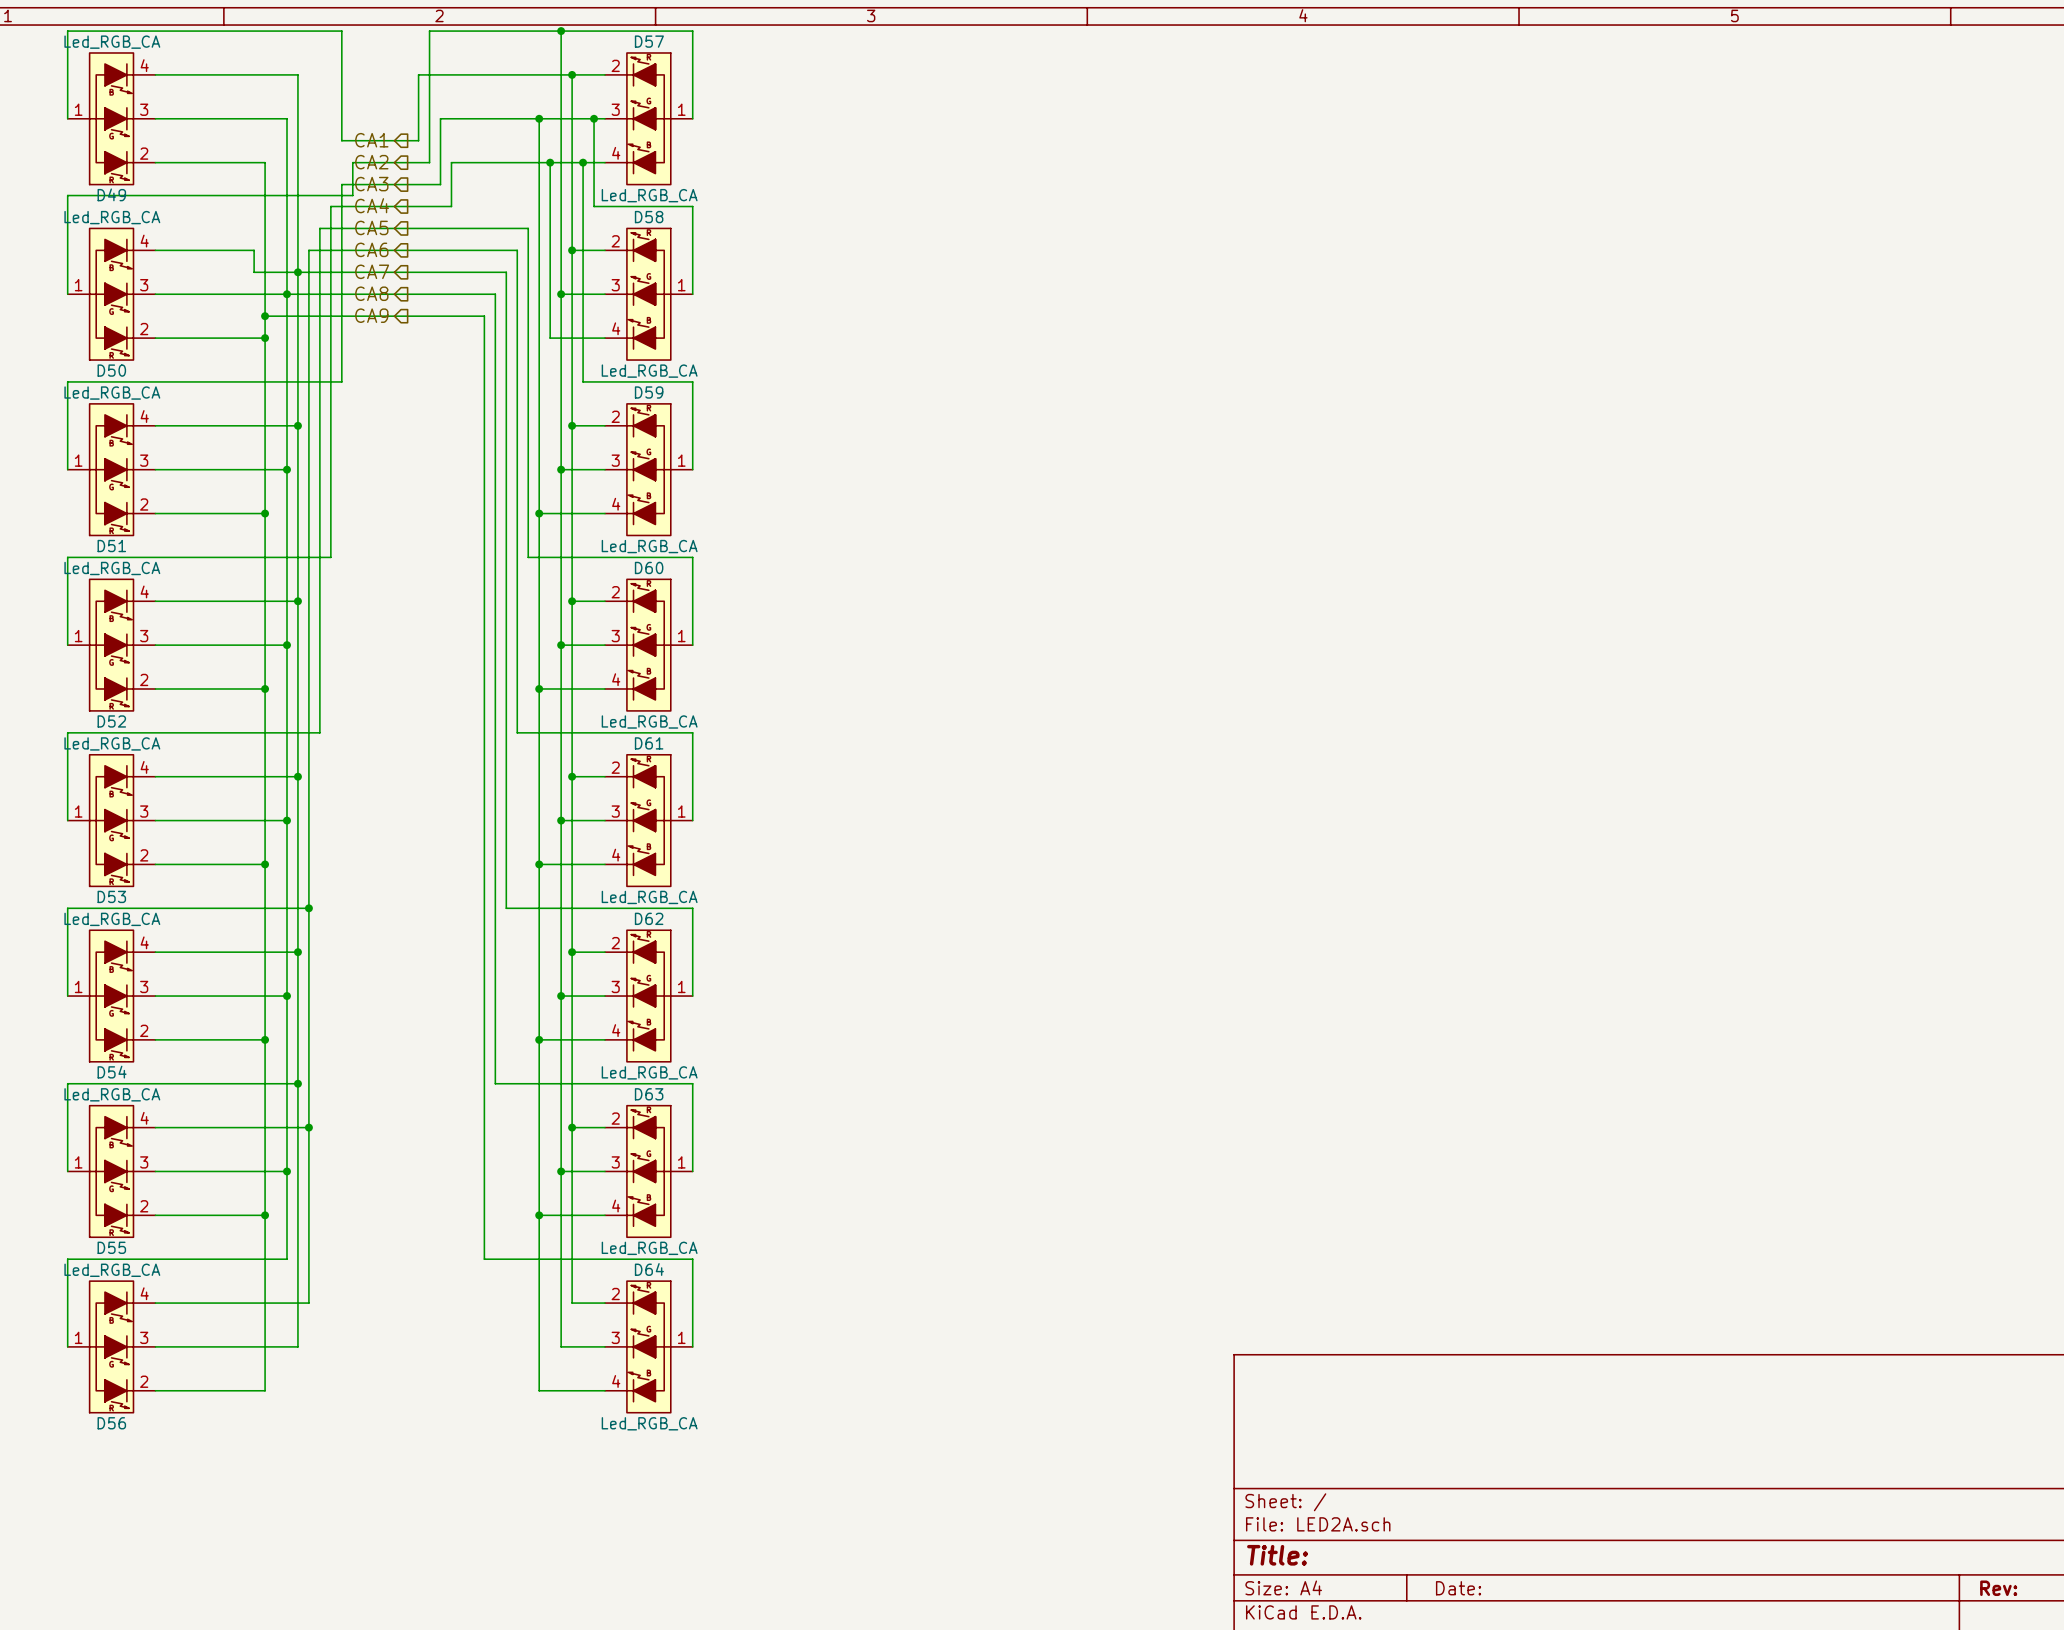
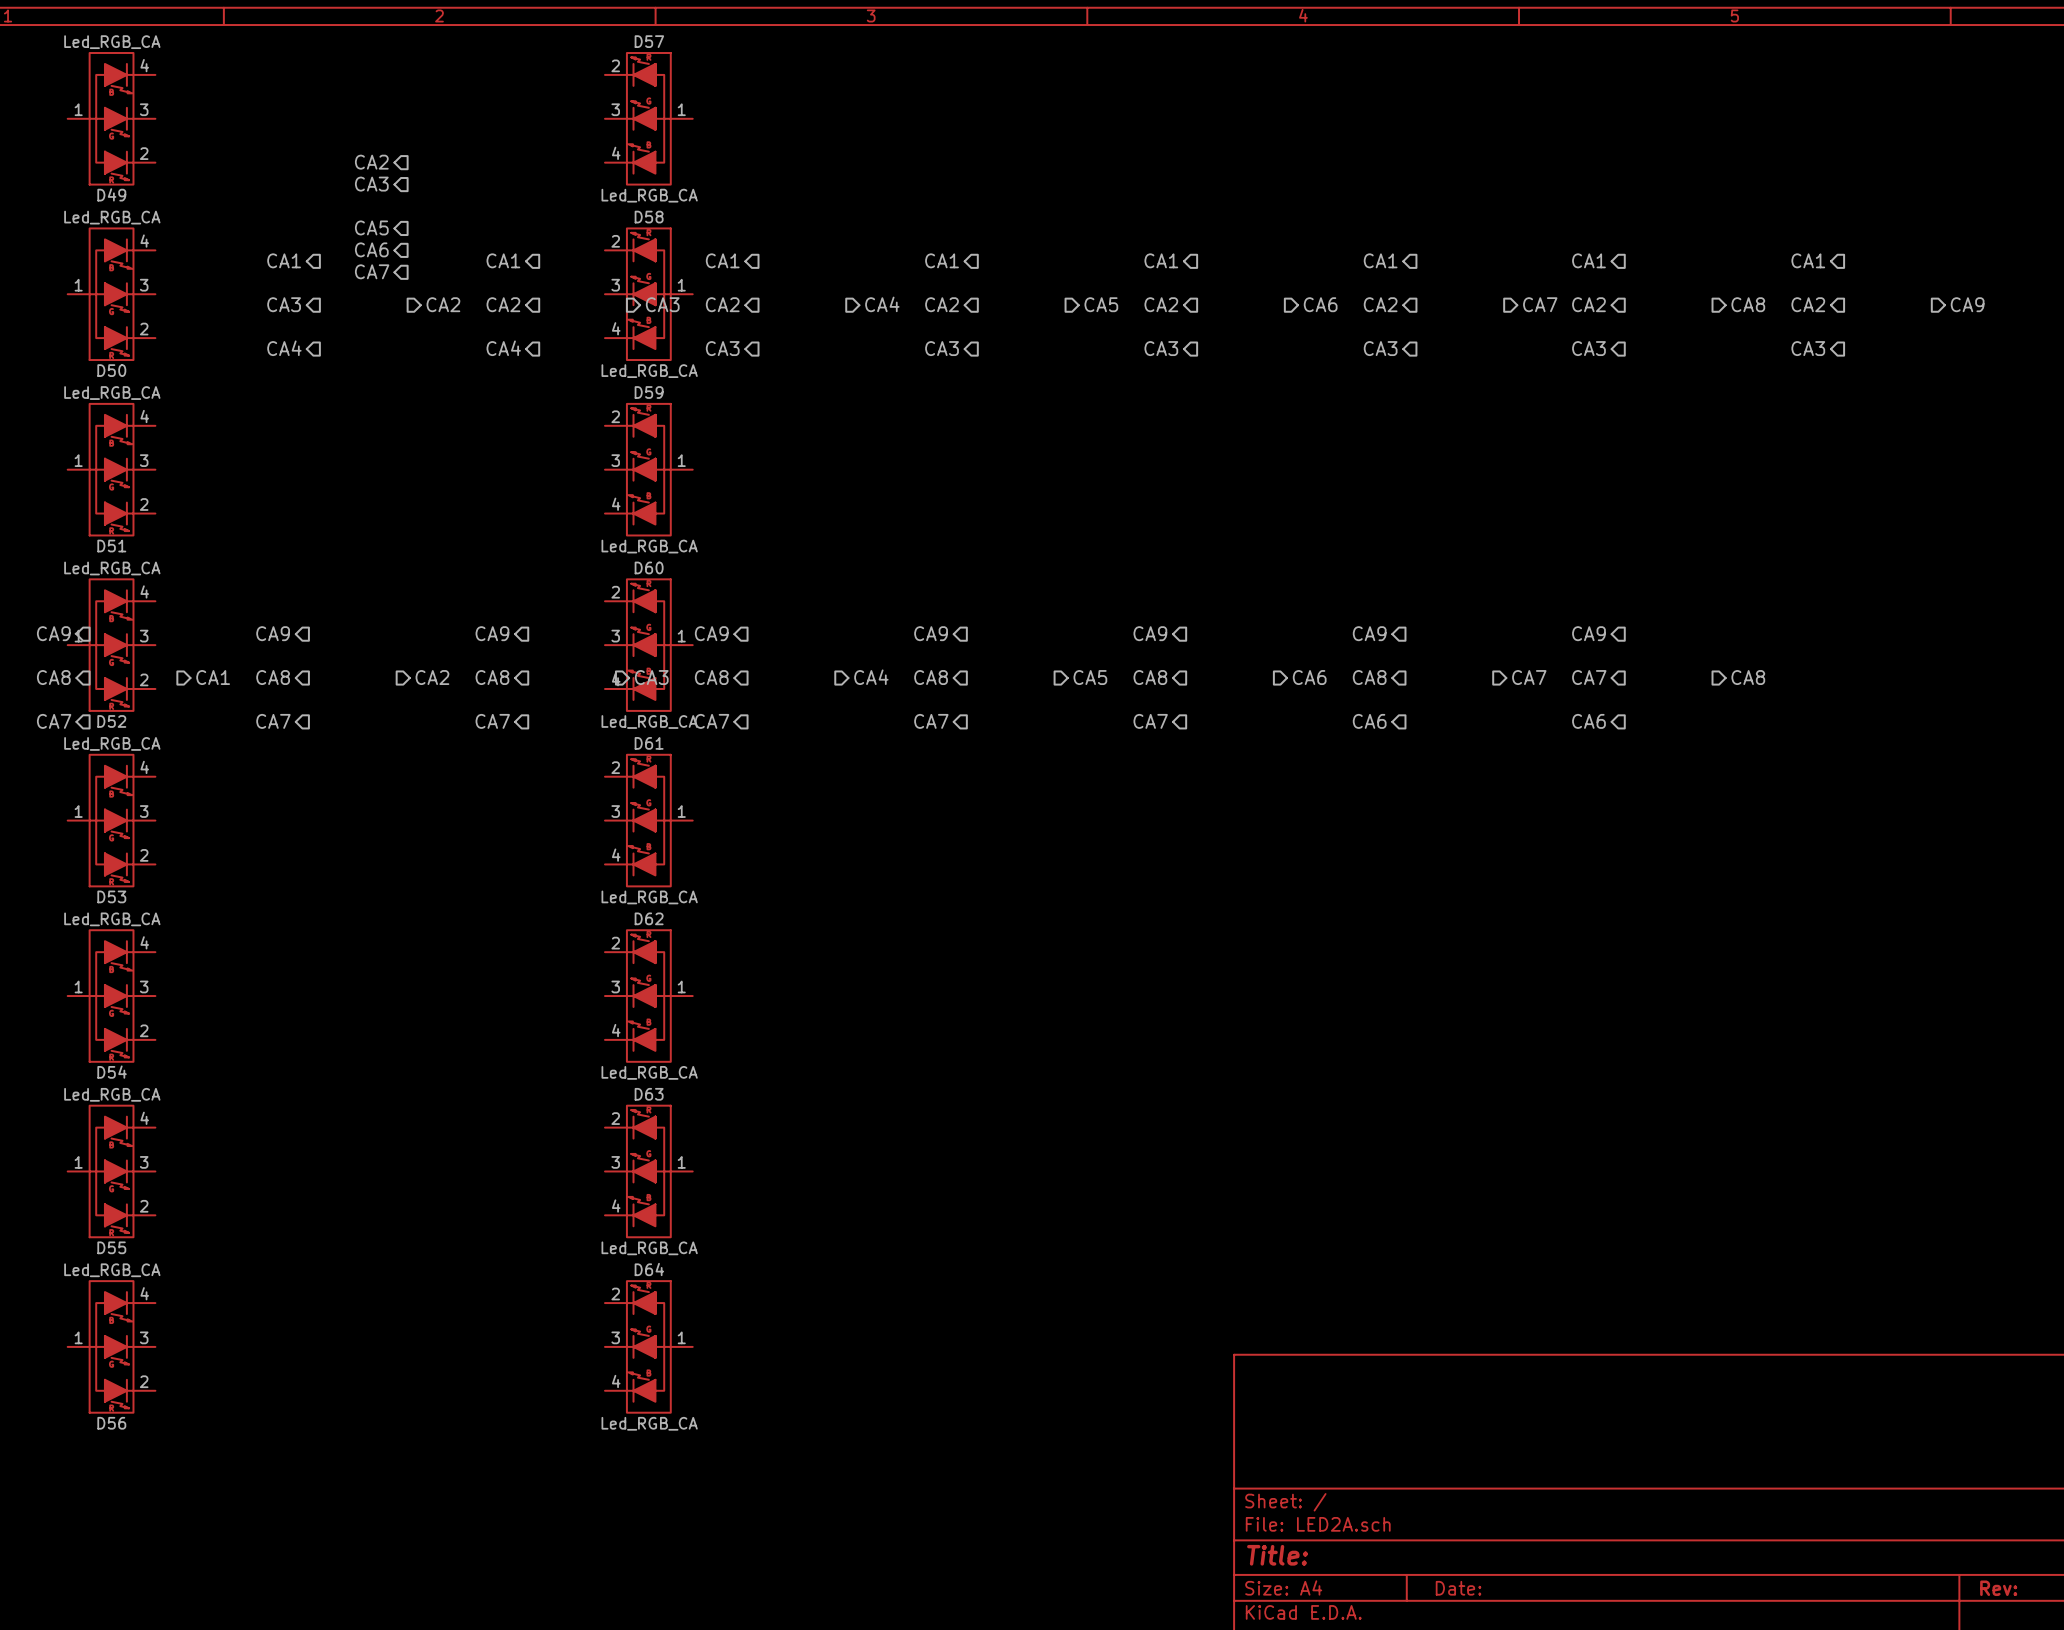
wire: (561, 31) (561, 1346) (604, 1346) -> none
junction: (561, 31) -> none
wire: (155, 74) (297, 74) (297, 1346) (155, 1346) -> none
wire: (572, 74) (572, 1303) (604, 1303) -> none
junction: (572, 74) -> none
wire: (604, 74) (418, 74) (418, 140) (341, 140) (341, 31) (67, 31) (67, 118) -> none
wire: (155, 118) (287, 118) (287, 1259) (67, 1259) (67, 1346) -> none
wire: (539, 118) (539, 1390) (604, 1390) -> none
junction: (539, 118) -> none
wire: (594, 118) (594, 206) (692, 206) (692, 294) -> none
junction: (594, 118) -> none
wire: (604, 118) (440, 118) (440, 184) (341, 184) (341, 381) (67, 381) (67, 469) -> none
wire: (692, 118) (692, 31) (429, 31) (429, 162) (352, 162) (352, 195) (67, 195) (67, 294) -> none
hierarchical label: CA1 (371, 140) -> none
wire: (155, 162) (265, 162) (265, 1390) (155, 1390) -> none
wire: (550, 162) (550, 338) (604, 338) -> none
junction: (550, 162) -> none
wire: (583, 162) (583, 381) (692, 381) (692, 469) -> none
junction: (583, 162) -> none
wire: (604, 162) (451, 162) (451, 206) (330, 206) (330, 557) (67, 557) (67, 645) -> none
hierarchical label: CA4 (372, 205) -> none
wire: (155, 250) (254, 250) (254, 272) (506, 272) (506, 908) (692, 908) (692, 996) -> none
wire: (572, 250) (604, 250) -> none
junction: (572, 250) -> none
hierarchical label: none -> CA1 (284, 260)
hierarchical label: none -> CA1 (503, 260)
hierarchical label: none -> CA1 (722, 260)
hierarchical label: none -> CA1 (942, 260)
hierarchical label: none -> CA1 (1161, 260)
hierarchical label: none -> CA1 (1380, 260)
hierarchical label: none -> CA1 (1588, 260)
hierarchical label: none -> CA1 (1808, 260)
junction: (297, 272) -> none
hierarchical label: CA8 (371, 293) -> none
wire: (155, 294) (495, 294) (495, 1083) (692, 1083) (692, 1171) -> none
junction: (287, 294) -> none
wire: (561, 294) (604, 294) -> none
junction: (561, 294) -> none
hierarchical label: none -> CA3 (284, 304)
hierarchical label: none -> CA2 (443, 304)
hierarchical label: none -> CA2 (503, 304)
hierarchical label: none -> CA3 (662, 304)
hierarchical label: none -> CA2 (722, 304)
hierarchical label: none -> CA4 (882, 304)
hierarchical label: none -> CA2 (942, 304)
hierarchical label: none -> CA5 (1101, 304)
hierarchical label: none -> CA2 (1161, 304)
hierarchical label: none -> CA6 (1320, 304)
hierarchical label: none -> CA2 (1380, 304)
hierarchical label: none -> CA7 (1540, 304)
hierarchical label: none -> CA2 (1588, 304)
hierarchical label: none -> CA8 (1748, 304)
hierarchical label: none -> CA2 (1808, 304)
hierarchical label: none -> CA9 (1967, 304)
hierarchical label: CA9 (371, 315) -> none
wire: (265, 316) (484, 316) (484, 1259) (692, 1259) (692, 1346) -> none
junction: (265, 316) -> none
wire: (155, 338) (265, 338) -> none
junction: (265, 338) -> none
hierarchical label: none -> CA4 (284, 348)
hierarchical label: none -> CA4 (503, 348)
hierarchical label: none -> CA3 (722, 348)
hierarchical label: none -> CA3 (942, 348)
hierarchical label: none -> CA3 (1161, 348)
hierarchical label: none -> CA3 (1380, 348)
hierarchical label: none -> CA3 (1588, 348)
hierarchical label: none -> CA3 (1808, 348)
wire: (155, 425) (297, 425) -> none
junction: (297, 425) -> none
wire: (572, 425) (604, 425) -> none
junction: (572, 425) -> none
wire: (155, 469) (287, 469) -> none
junction: (287, 469) -> none
wire: (561, 469) (604, 469) -> none
junction: (561, 469) -> none
wire: (155, 513) (265, 513) -> none
junction: (265, 513) -> none
wire: (539, 513) (604, 513) -> none
junction: (539, 513) -> none
wire: (155, 601) (297, 601) -> none
junction: (297, 601) -> none
wire: (572, 601) (604, 601) -> none
junction: (572, 601) -> none
hierarchical label: none -> CA9 (53, 633)
hierarchical label: none -> CA9 (273, 633)
hierarchical label: none -> CA9 (492, 633)
hierarchical label: none -> CA9 (711, 633)
hierarchical label: none -> CA9 (931, 633)
hierarchical label: none -> CA9 (1150, 633)
hierarchical label: none -> CA9 (1369, 633)
hierarchical label: none -> CA9 (1588, 633)
wire: (155, 645) (287, 645) -> none
junction: (287, 645) -> none
wire: (561, 645) (604, 645) -> none
junction: (561, 645) -> none
wire: (692, 645) (692, 557) (528, 557) (528, 228) (319, 228) (319, 732) (67, 732) (67, 820) -> none
hierarchical label: none -> CA8 (53, 677)
hierarchical label: none -> CA1 (213, 677)
hierarchical label: none -> CA8 (273, 677)
hierarchical label: none -> CA2 (432, 677)
hierarchical label: none -> CA8 (492, 677)
hierarchical label: none -> CA3 (651, 677)
hierarchical label: none -> CA8 (711, 677)
hierarchical label: none -> CA4 (871, 677)
hierarchical label: none -> CA8 (931, 677)
hierarchical label: none -> CA5 (1090, 677)
hierarchical label: none -> CA8 (1150, 677)
hierarchical label: none -> CA6 (1309, 677)
hierarchical label: none -> CA8 (1369, 677)
hierarchical label: none -> CA7 (1529, 677)
hierarchical label: none -> CA7 (1589, 677)
hierarchical label: none -> CA8 (1748, 677)
wire: (155, 688) (265, 688) -> none
junction: (265, 688) -> none
wire: (539, 688) (604, 688) -> none
junction: (539, 688) -> none
hierarchical label: none -> CA7 (54, 721)
hierarchical label: none -> CA7 (273, 721)
hierarchical label: none -> CA7 (492, 721)
hierarchical label: none -> CA7 (712, 721)
hierarchical label: none -> CA7 (931, 721)
hierarchical label: none -> CA7 (1150, 721)
hierarchical label: none -> CA6 (1369, 721)
hierarchical label: none -> CA6 (1588, 721)
wire: (155, 776) (297, 776) -> none
junction: (297, 776) -> none
wire: (572, 776) (604, 776) -> none
junction: (572, 776) -> none
wire: (155, 820) (287, 820) -> none
junction: (287, 820) -> none
wire: (561, 820) (604, 820) -> none
junction: (561, 820) -> none
wire: (692, 820) (692, 732) (517, 732) (517, 250) (308, 250) (308, 1303) (155, 1303) -> none
wire: (155, 864) (265, 864) -> none
junction: (265, 864) -> none
wire: (539, 864) (604, 864) -> none
junction: (539, 864) -> none
wire: (308, 908) (67, 908) (67, 996) -> none
junction: (308, 908) -> none
wire: (155, 952) (297, 952) -> none
junction: (297, 952) -> none
wire: (572, 952) (604, 952) -> none
junction: (572, 952) -> none
wire: (155, 996) (287, 996) -> none
junction: (287, 996) -> none
wire: (561, 996) (604, 996) -> none
junction: (561, 996) -> none
wire: (155, 1039) (265, 1039) -> none
junction: (265, 1039) -> none
wire: (539, 1039) (604, 1039) -> none
junction: (539, 1039) -> none
wire: (297, 1083) (67, 1083) (67, 1171) -> none
junction: (297, 1083) -> none
wire: (155, 1127) (308, 1127) -> none
junction: (308, 1127) -> none
wire: (572, 1127) (604, 1127) -> none
junction: (572, 1127) -> none
wire: (155, 1171) (287, 1171) -> none
junction: (287, 1171) -> none
wire: (561, 1171) (604, 1171) -> none
junction: (561, 1171) -> none
wire: (155, 1215) (265, 1215) -> none
junction: (265, 1215) -> none
wire: (539, 1215) (604, 1215) -> none
junction: (539, 1215) -> none

